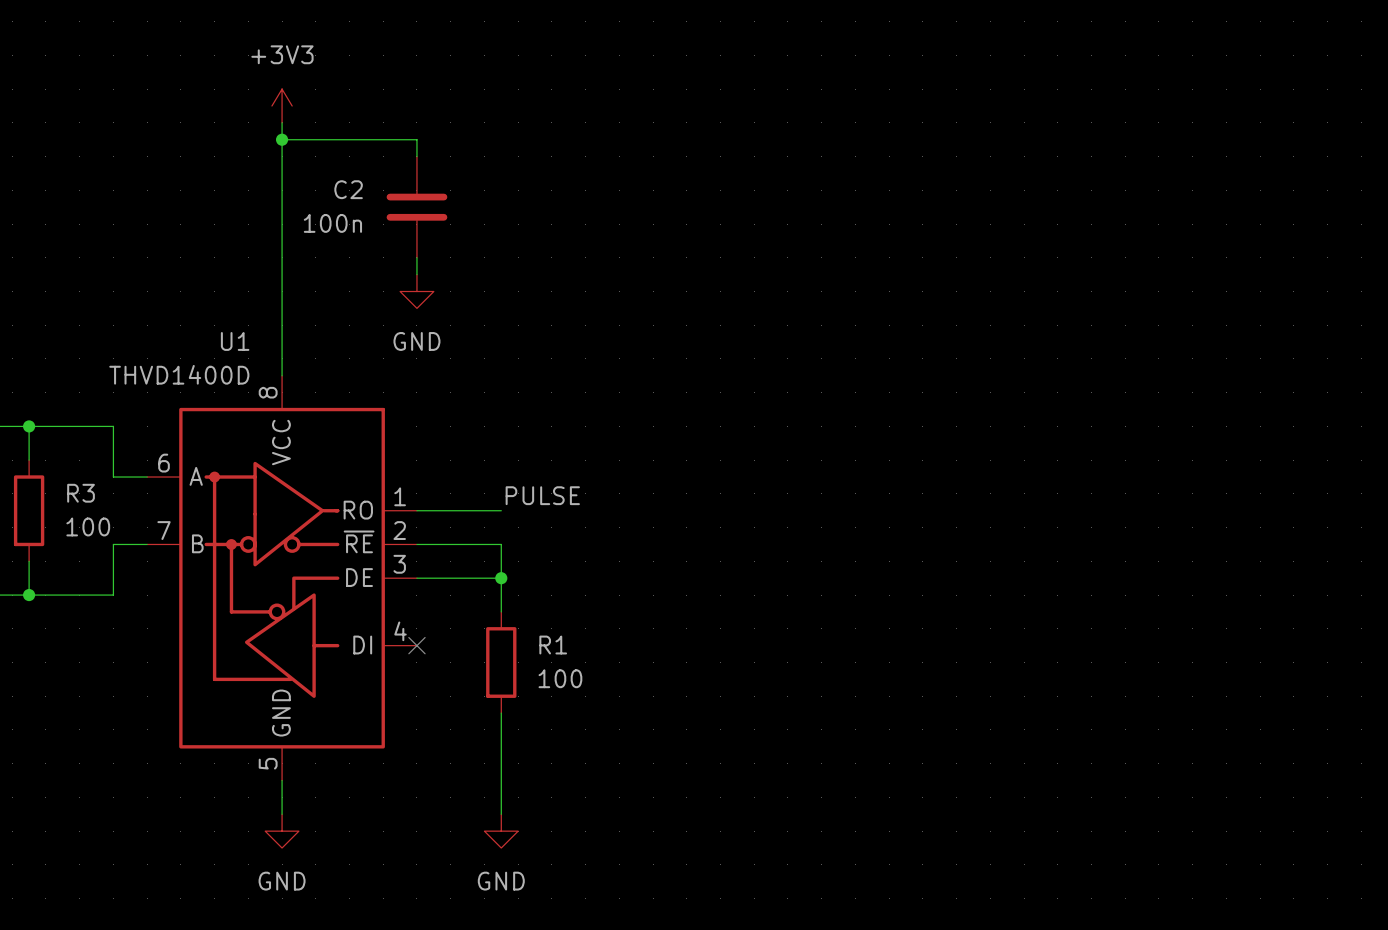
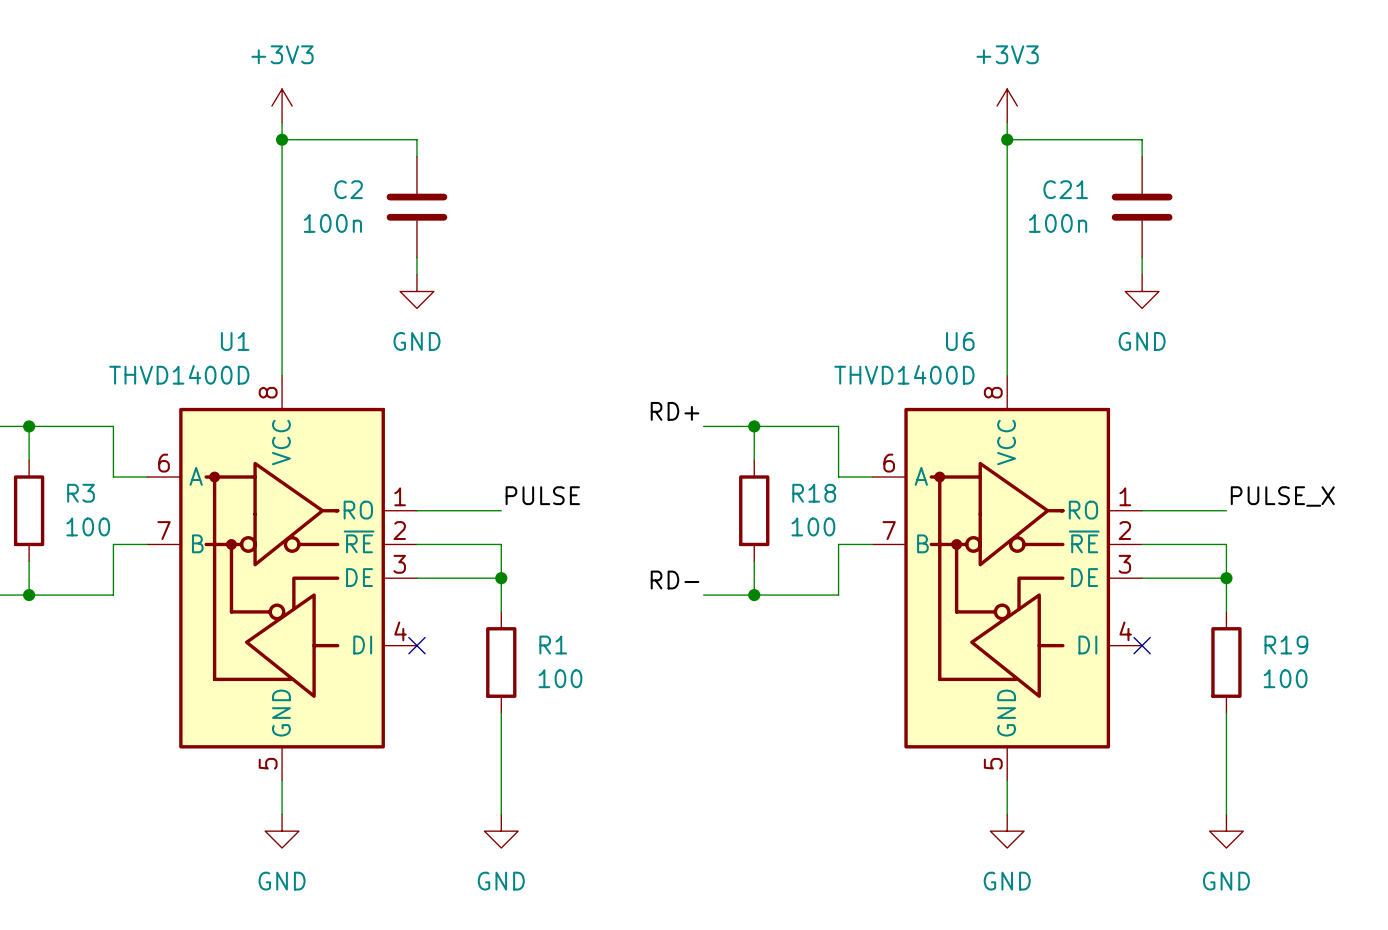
power symbol: none -> +3V3 (1007, 106)
wire: none -> (1007, 122) (1007, 375)
wire: none -> (1007, 139) (1142, 139) (1142, 156)
junction: none -> (1007, 139)
C21: none -> 100n (1142, 207)
wire: none -> (1142, 257) (1142, 274)
power symbol: none -> GND (1142, 291)
label: none -> RD+ (675, 411)
wire: none -> (703, 426) (838, 426) (838, 477) (872, 477)
wire: none -> (754, 426) (754, 460)
junction: none -> (754, 426)
label: none -> PULSE_X (1282, 496)
R18: none -> 100 (754, 510)
wire: none -> (1142, 510) (1226, 510)
wire: none -> (872, 544) (838, 544) (838, 595) (703, 595)
wire: none -> (1142, 544) (1226, 544) (1226, 611)
wire: none -> (754, 561) (754, 595)
U6: none -> THVD1400D (1007, 578)
wire: none -> (1142, 578) (1226, 578)
junction: none -> (1226, 578)
label: none -> RD- (675, 580)
junction: none -> (754, 595)
no-connect mark: none -> (1142, 645)
R19: none -> 100 (1226, 662)
wire: none -> (1226, 713) (1226, 814)
wire: none -> (1007, 780) (1007, 814)
power symbol: none -> GND (1007, 831)
power symbol: none -> GND (1226, 831)

